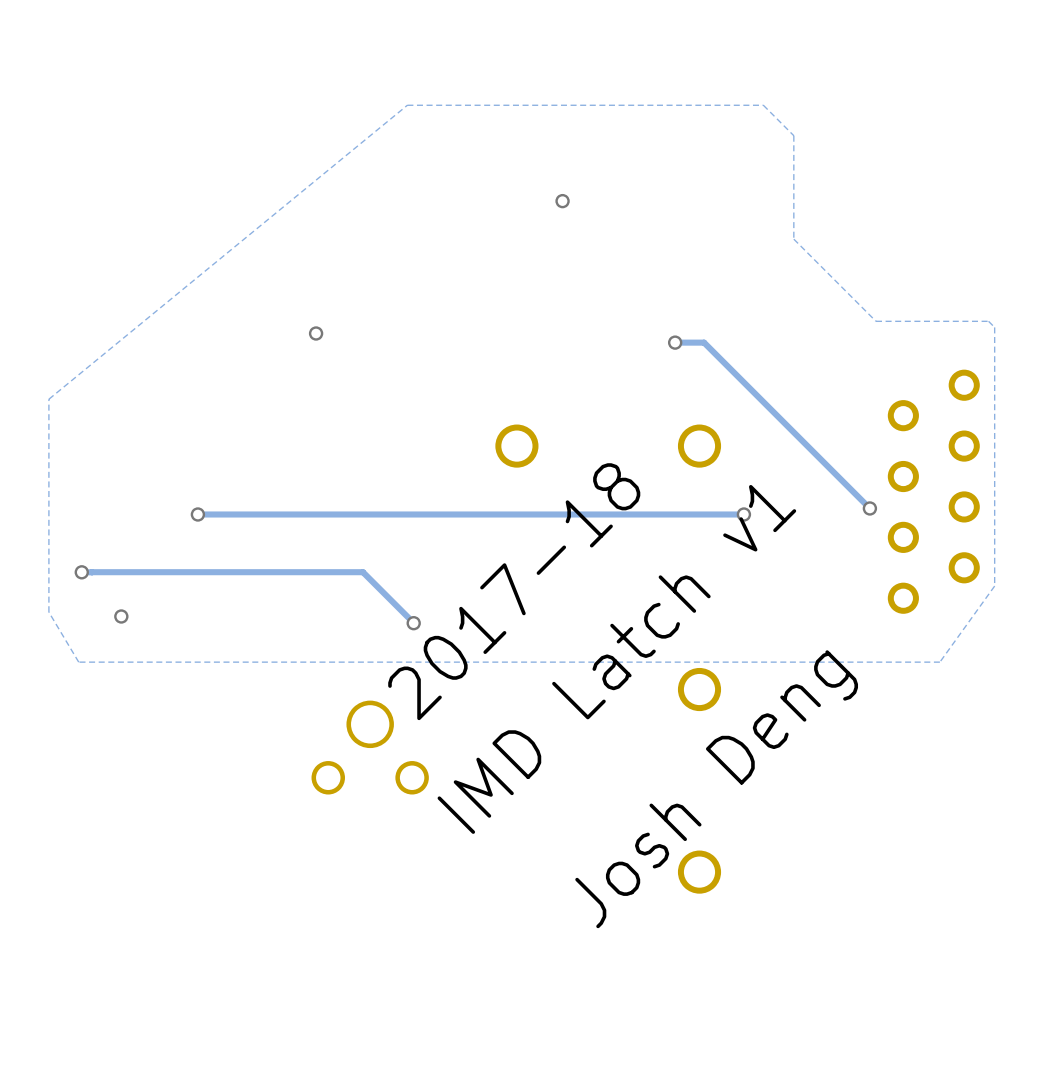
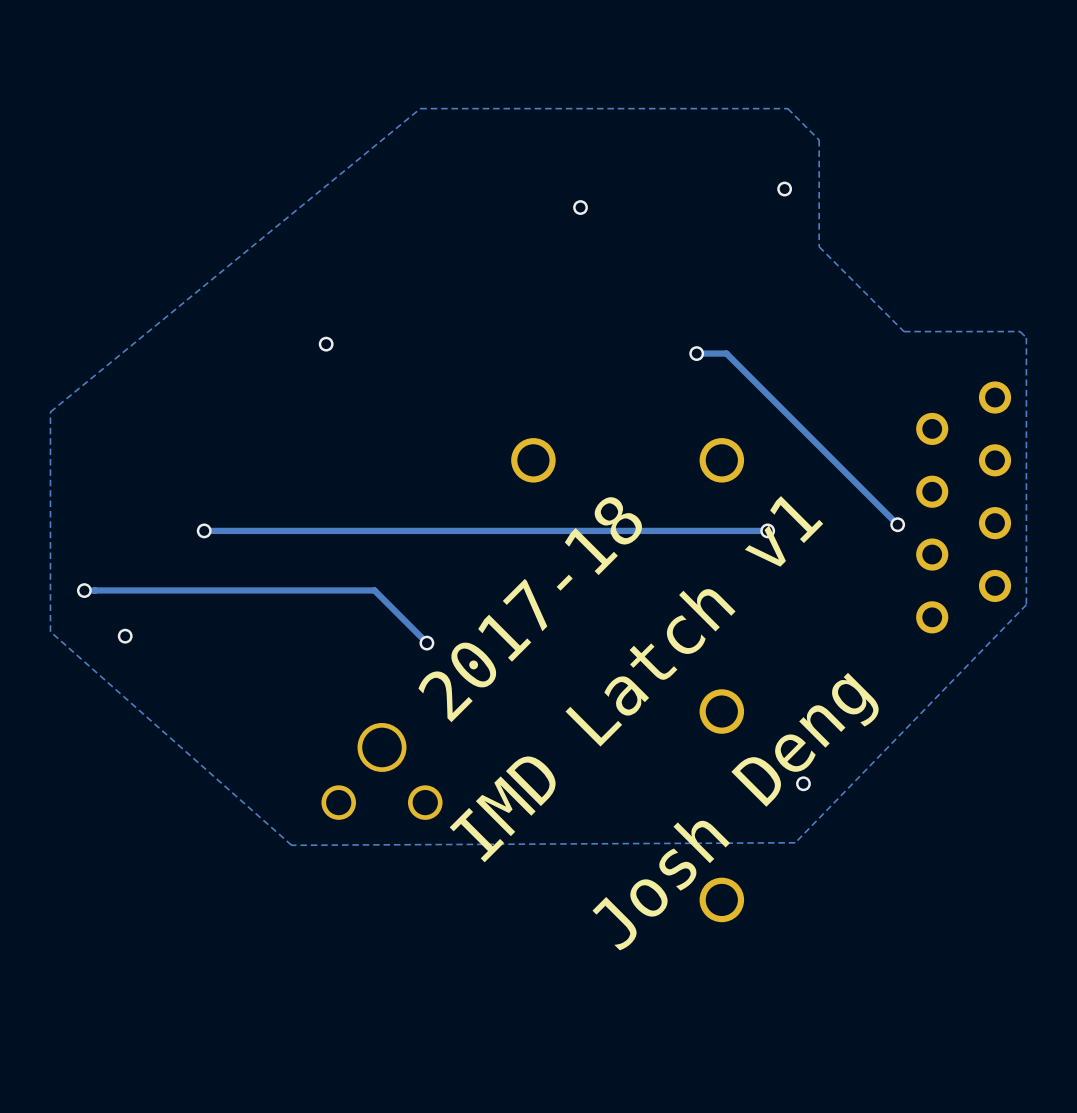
via: none -> (784, 189)
zone outline: (994, 586) (939, 662) (78, 662) (48, 612) -> (1026, 604) (795, 842) (291, 845) (50, 631)
via: none -> (803, 783)

